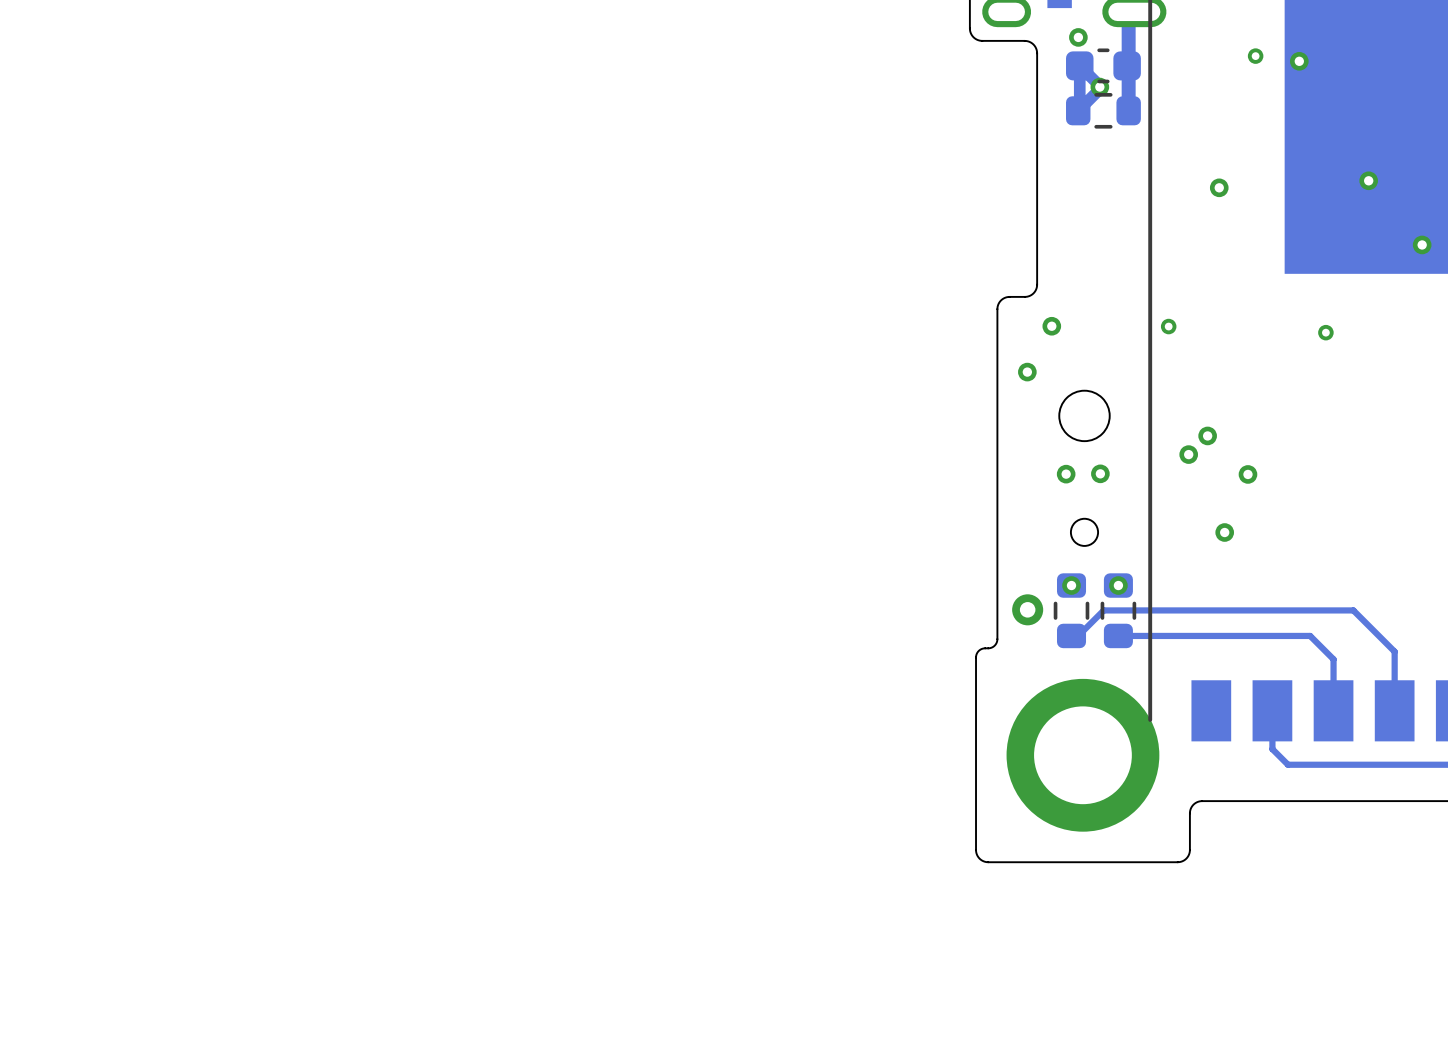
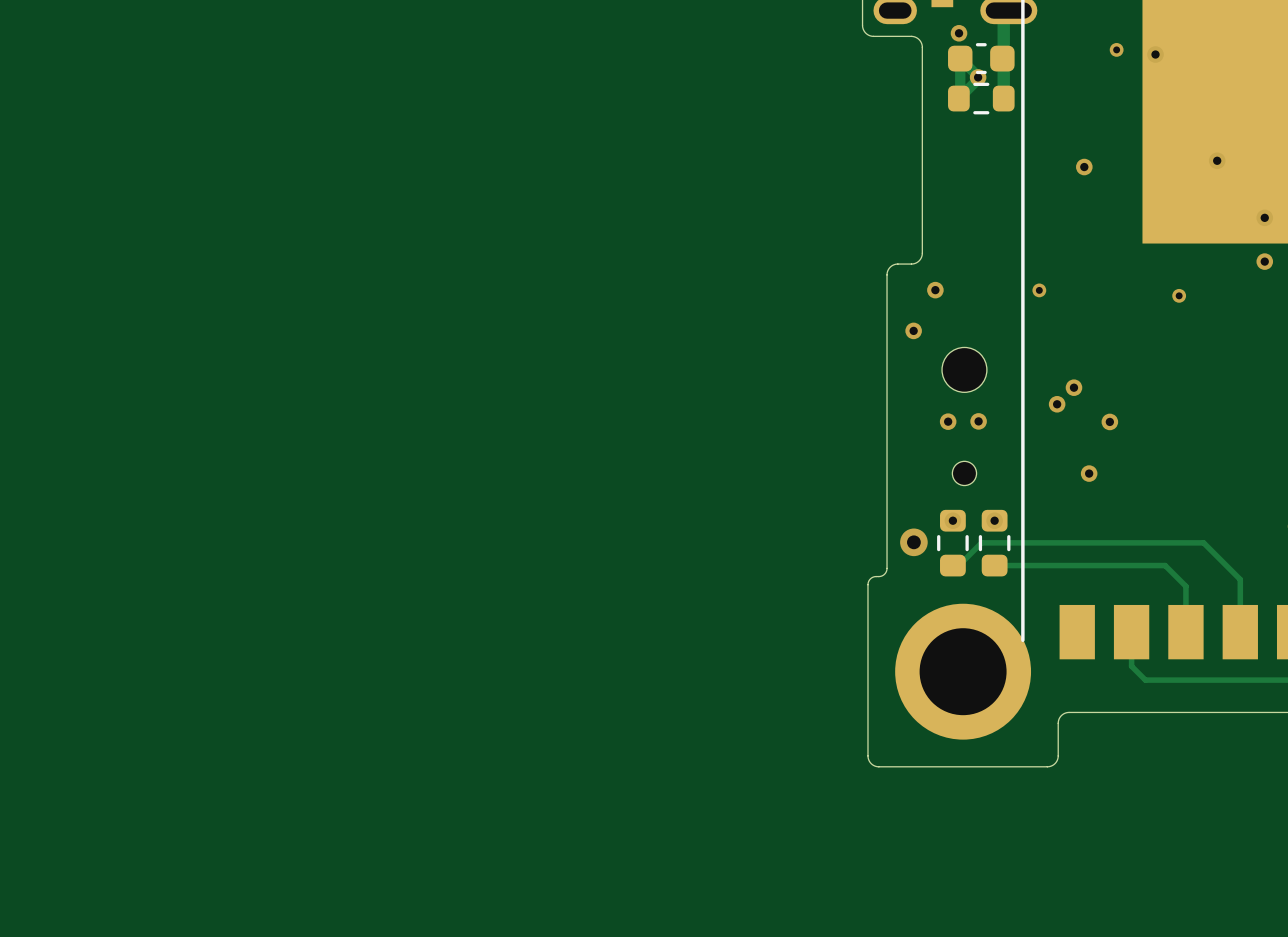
via: none -> (1264, 261)

